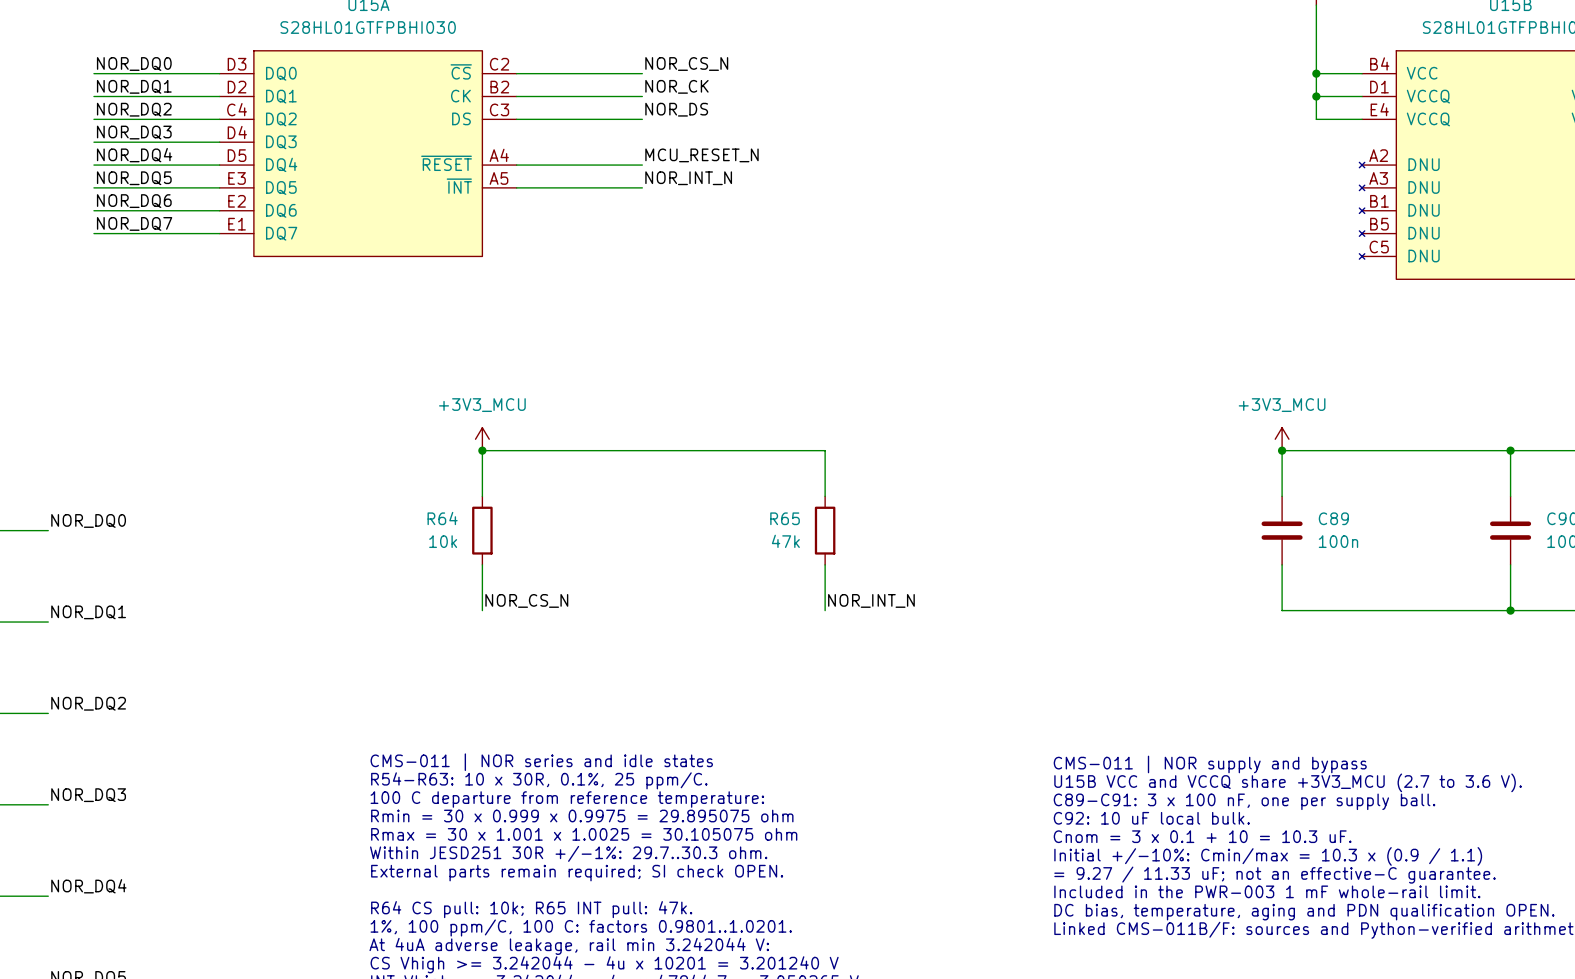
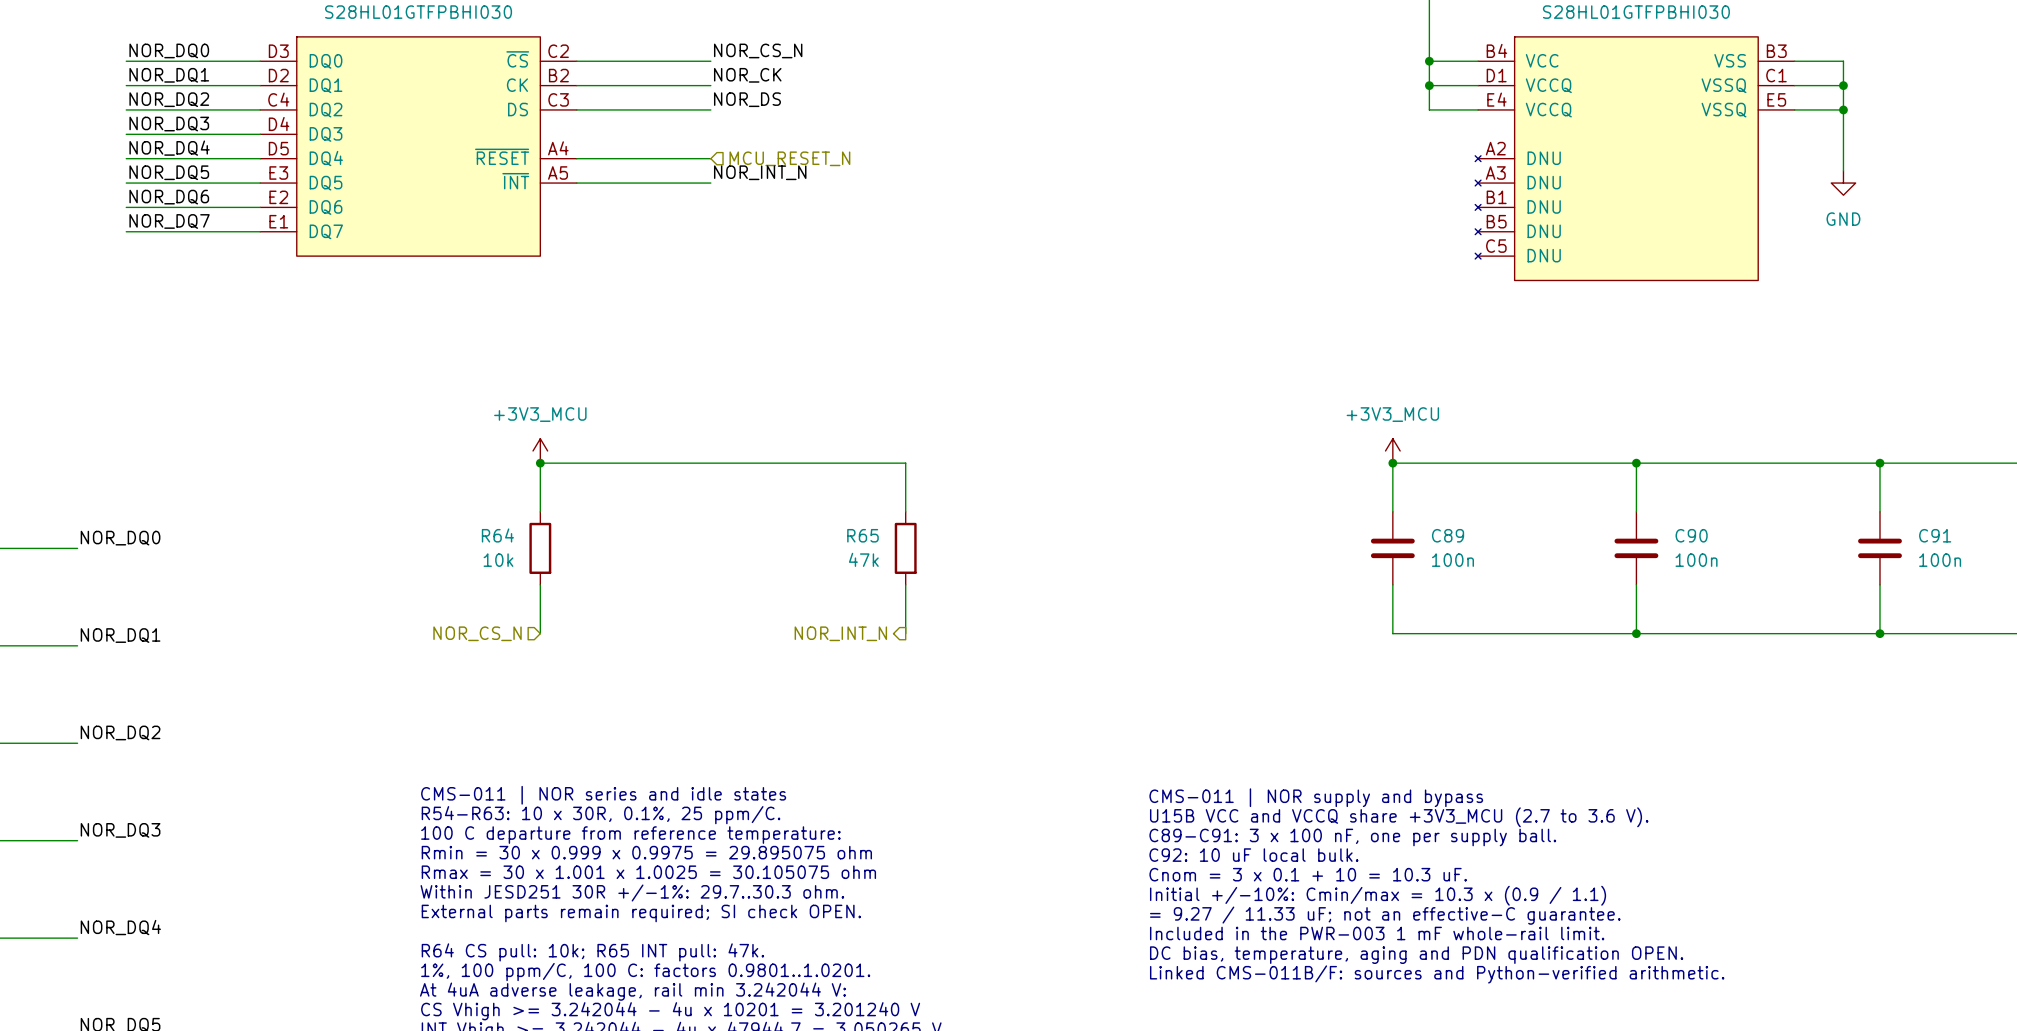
label: MCU_RESET_N (701, 155) -> none
hierarchical label: none -> MCU_RESET_N (789, 158)
label: NOR_CS_N (526, 600) -> none
label: NOR_INT_N (871, 600) -> none
hierarchical label: none -> NOR_CS_N (477, 633)
hierarchical label: none -> NOR_INT_N (840, 633)

